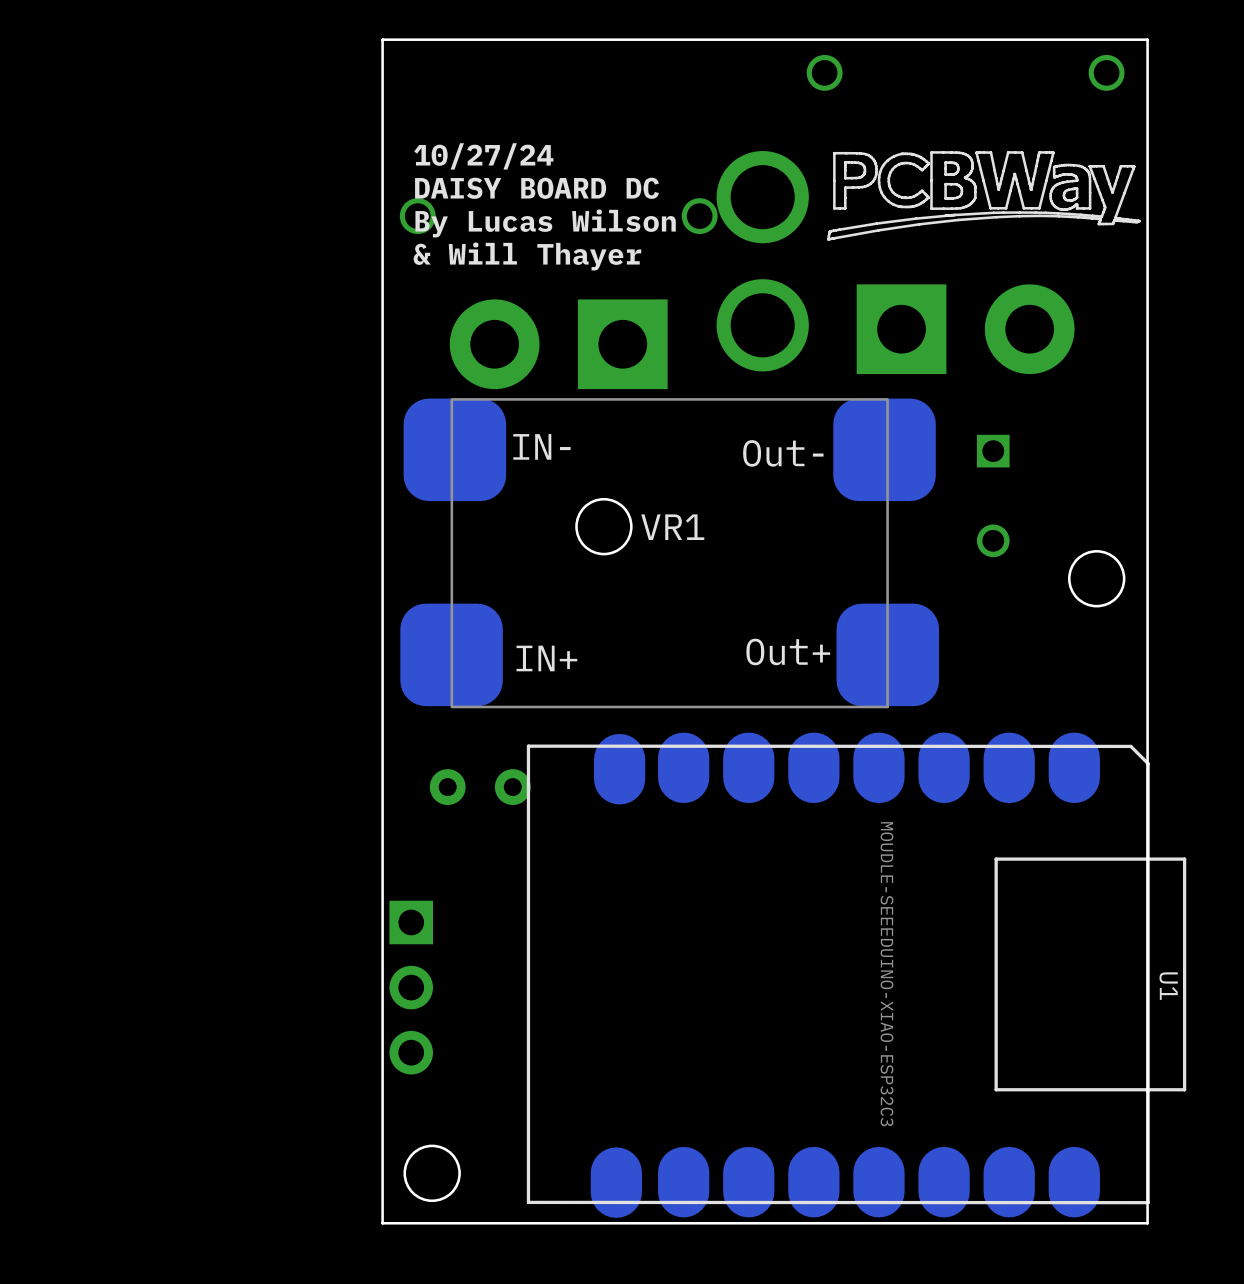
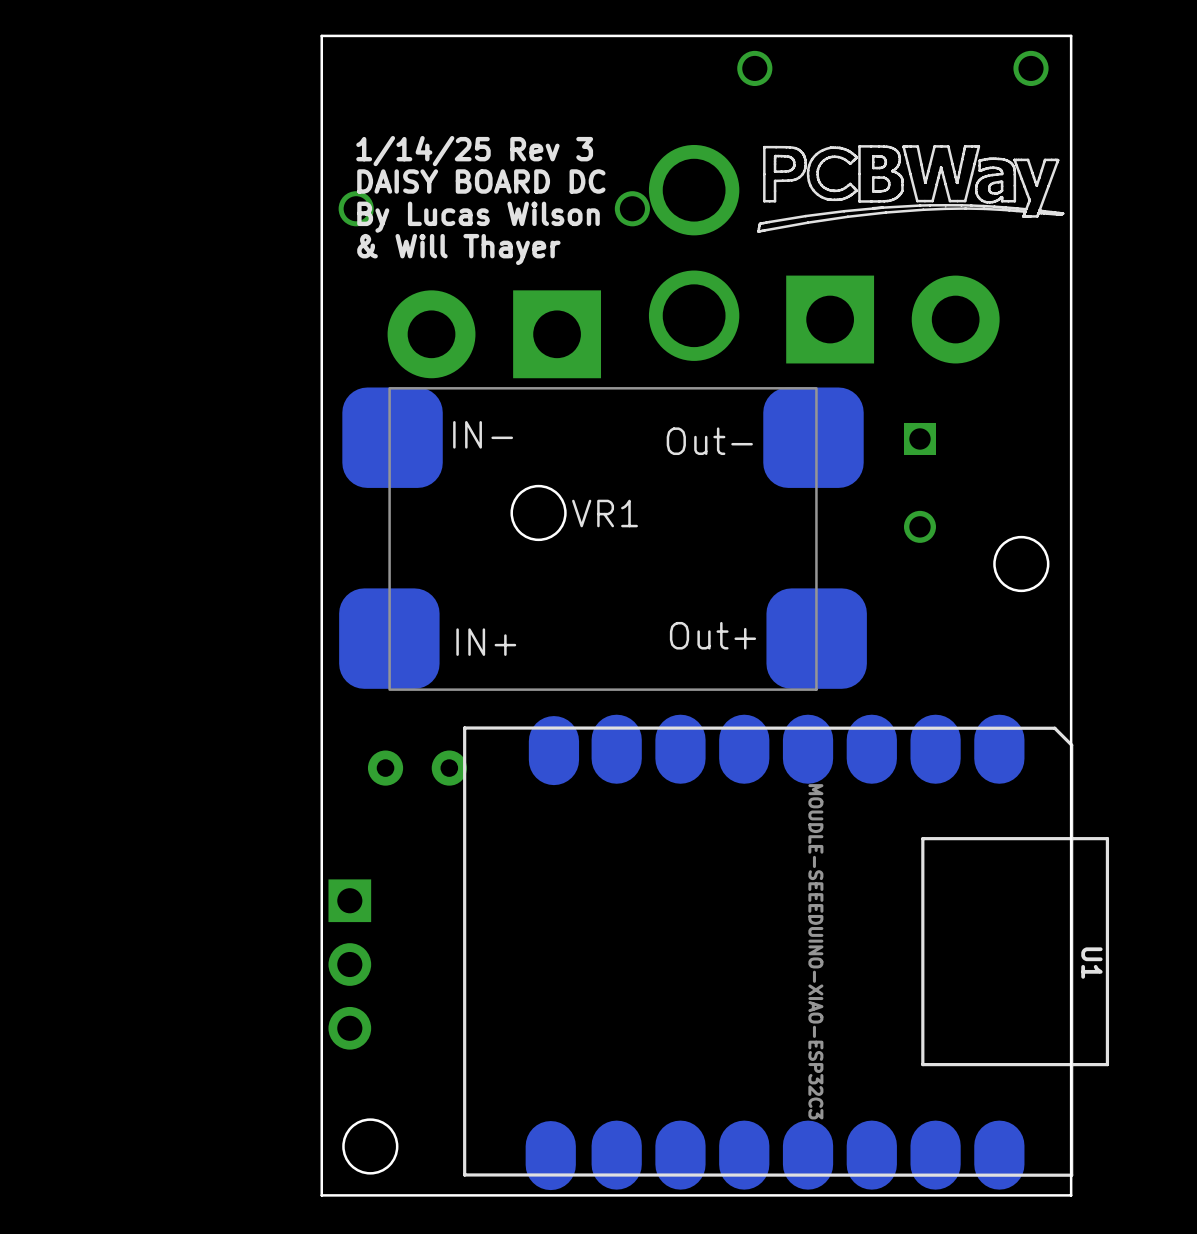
text: 10/27/24 (483, 156) -> 1/14/25 Rev 3 (474, 151)

